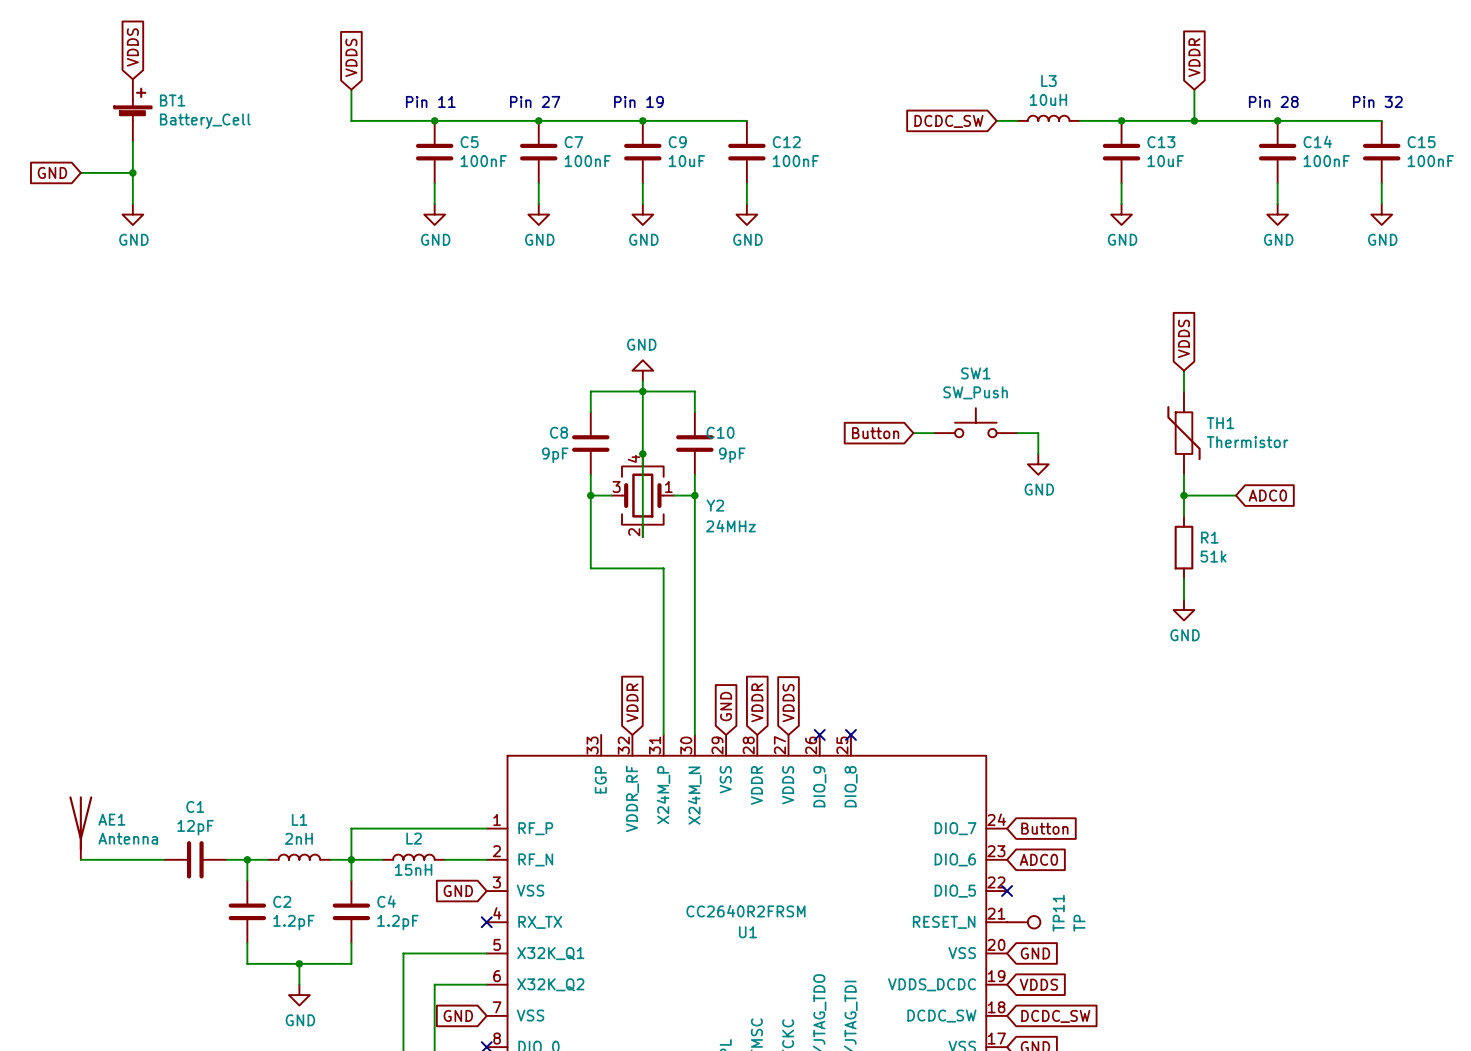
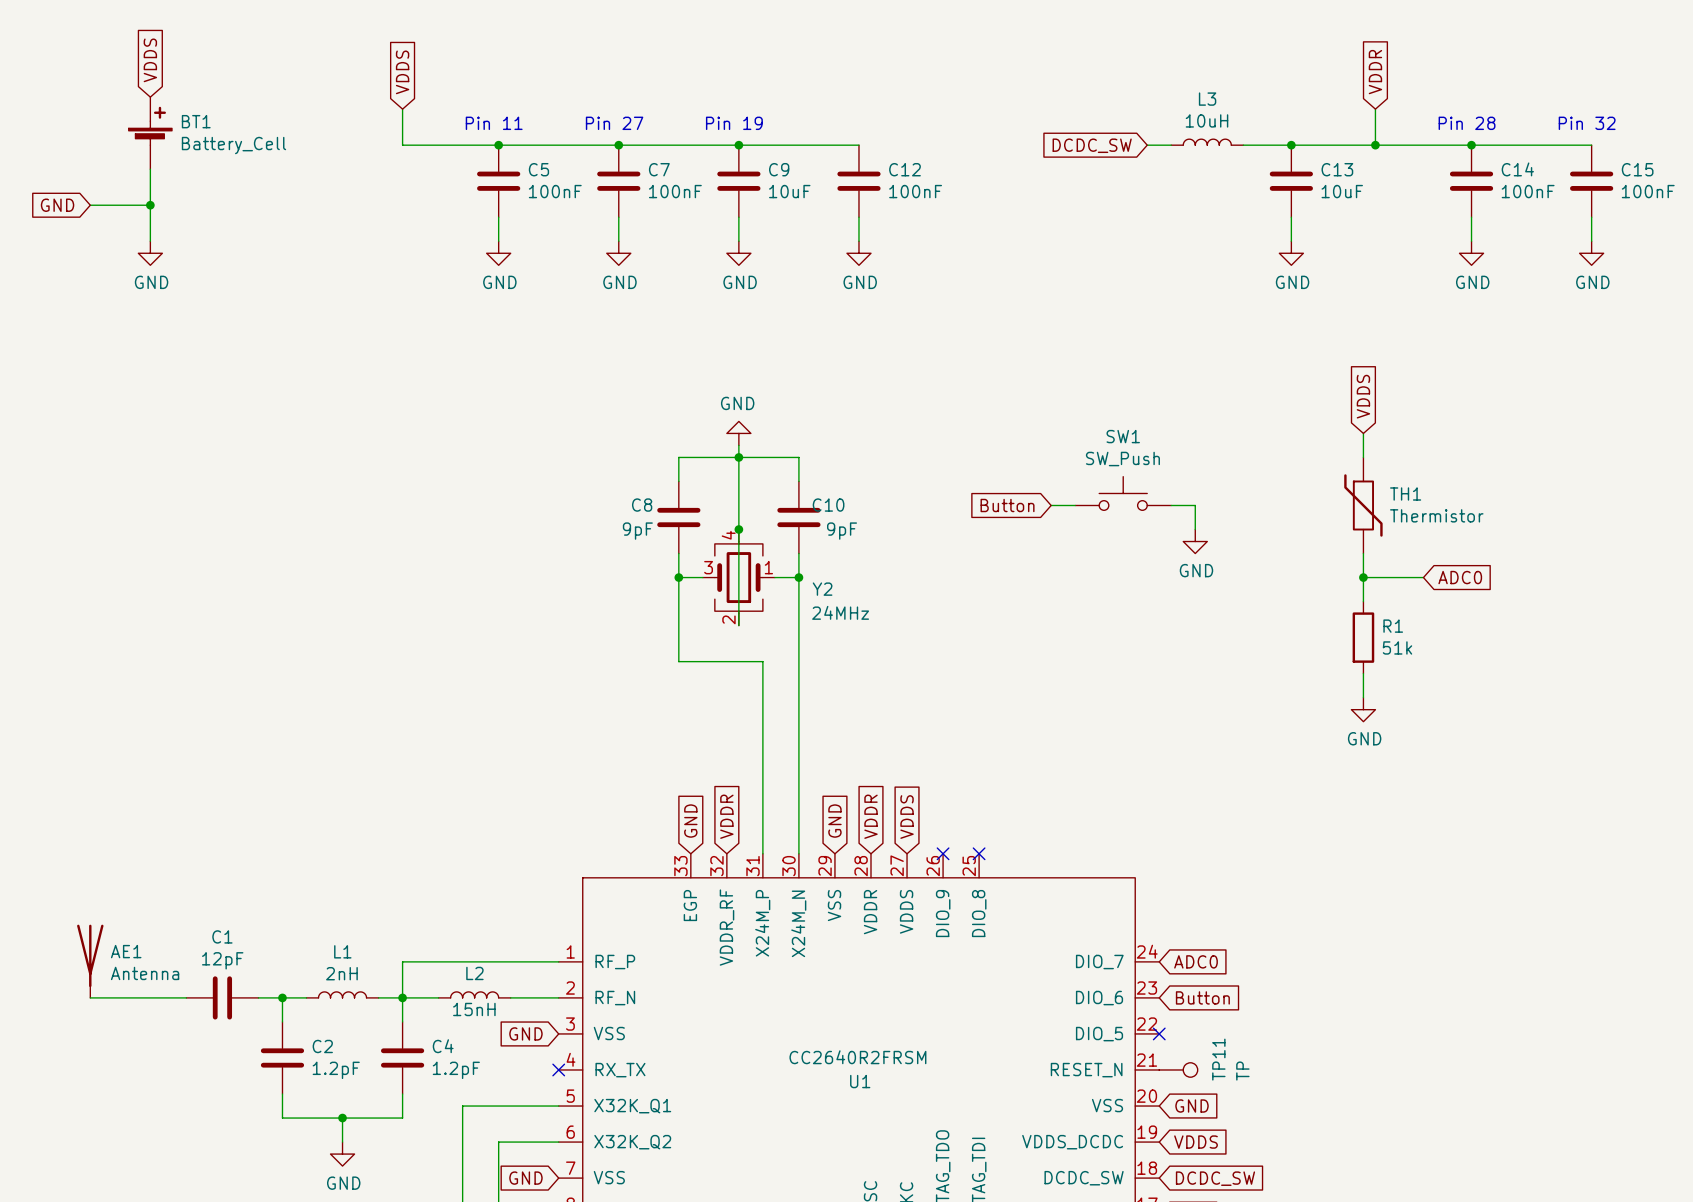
global label: none -> GND (690, 821)
global label: Button (1044, 828) -> ADC0 (1196, 961)
global label: ADC0 (1038, 859) -> Button (1202, 997)

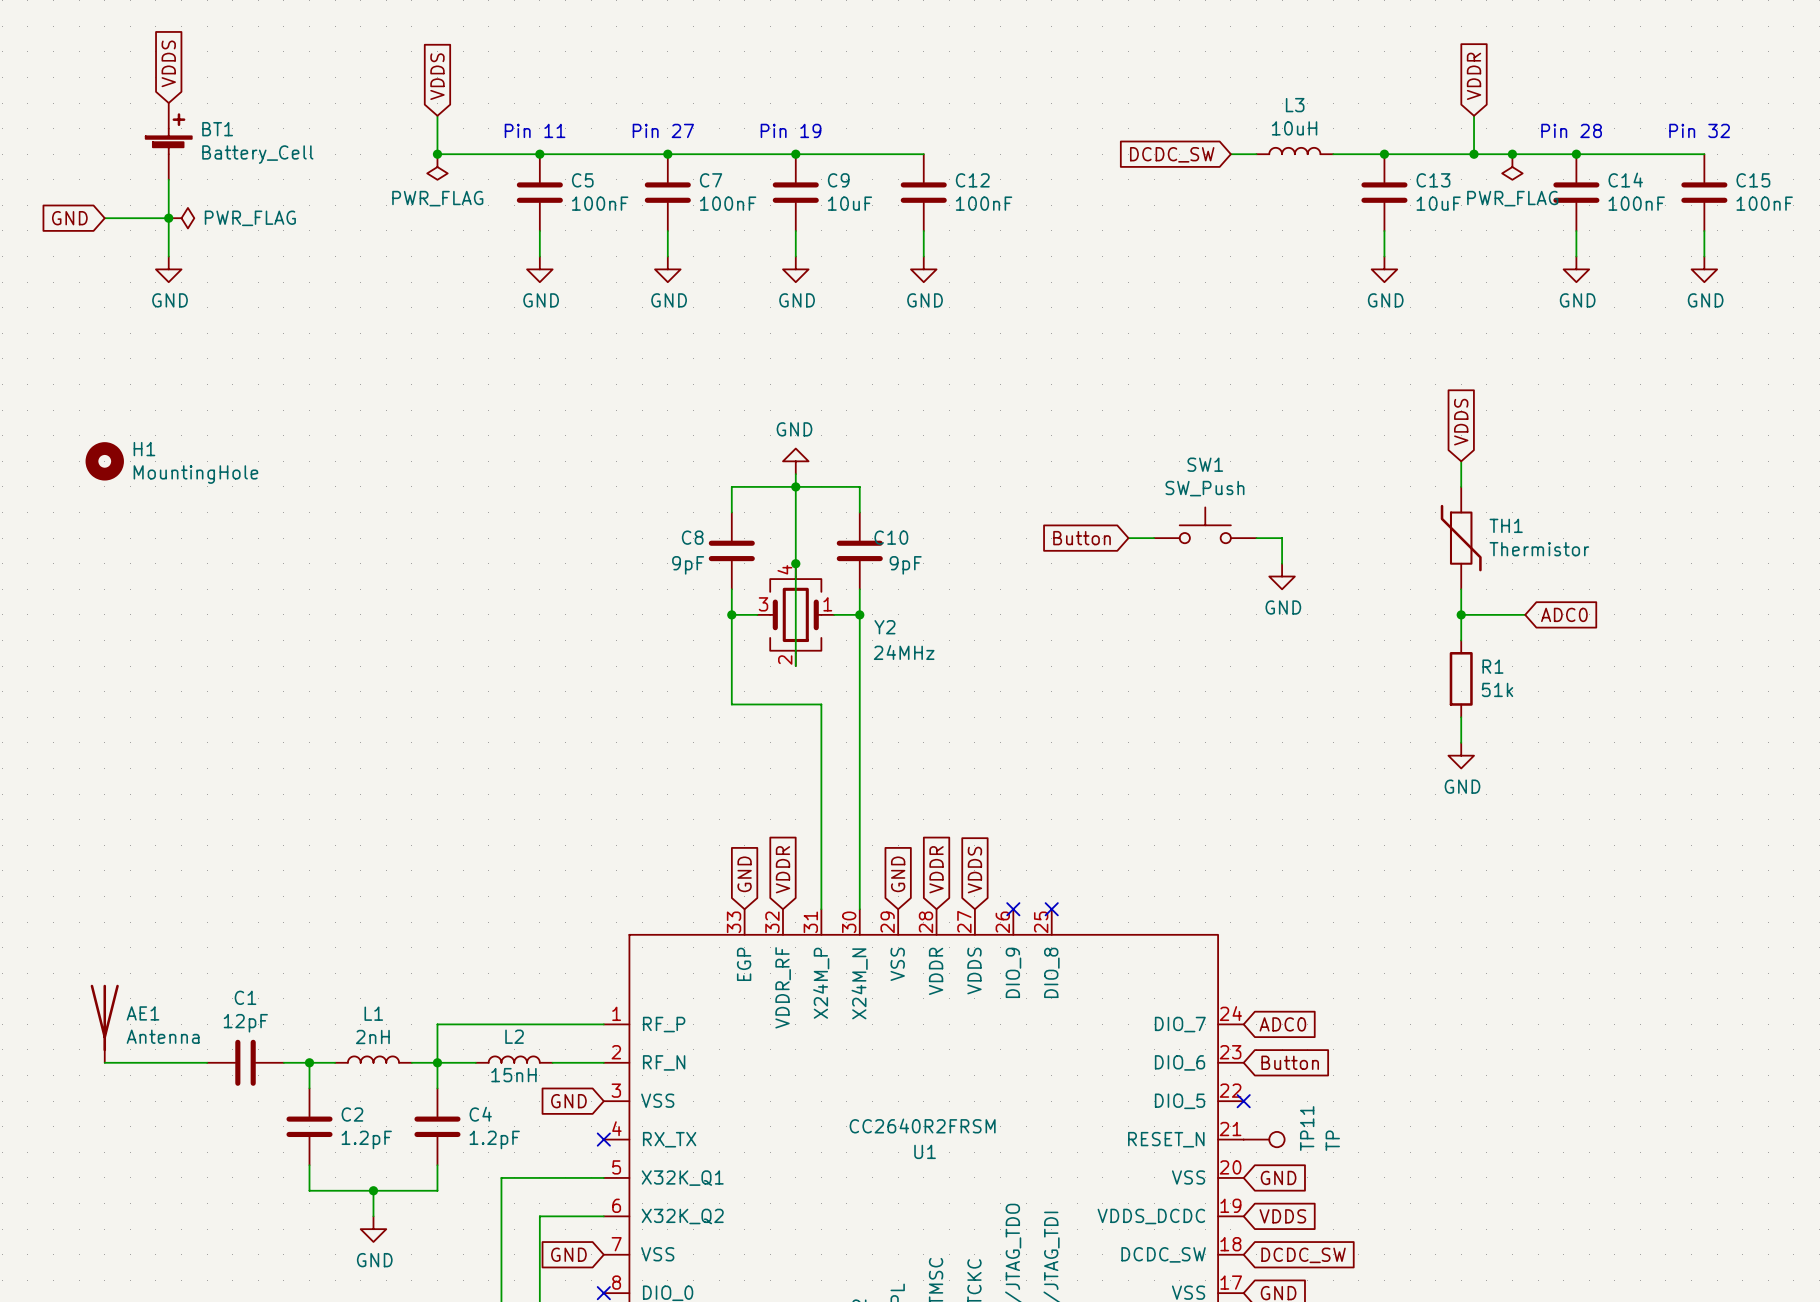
junction: none -> (437, 154)
junction: none -> (1512, 154)
power symbol: none -> PWR_FLAG (437, 167)
power symbol: none -> PWR_FLAG (1512, 167)
power symbol: none -> PWR_FLAG (181, 218)
H1: none -> MountingHole (104, 461)

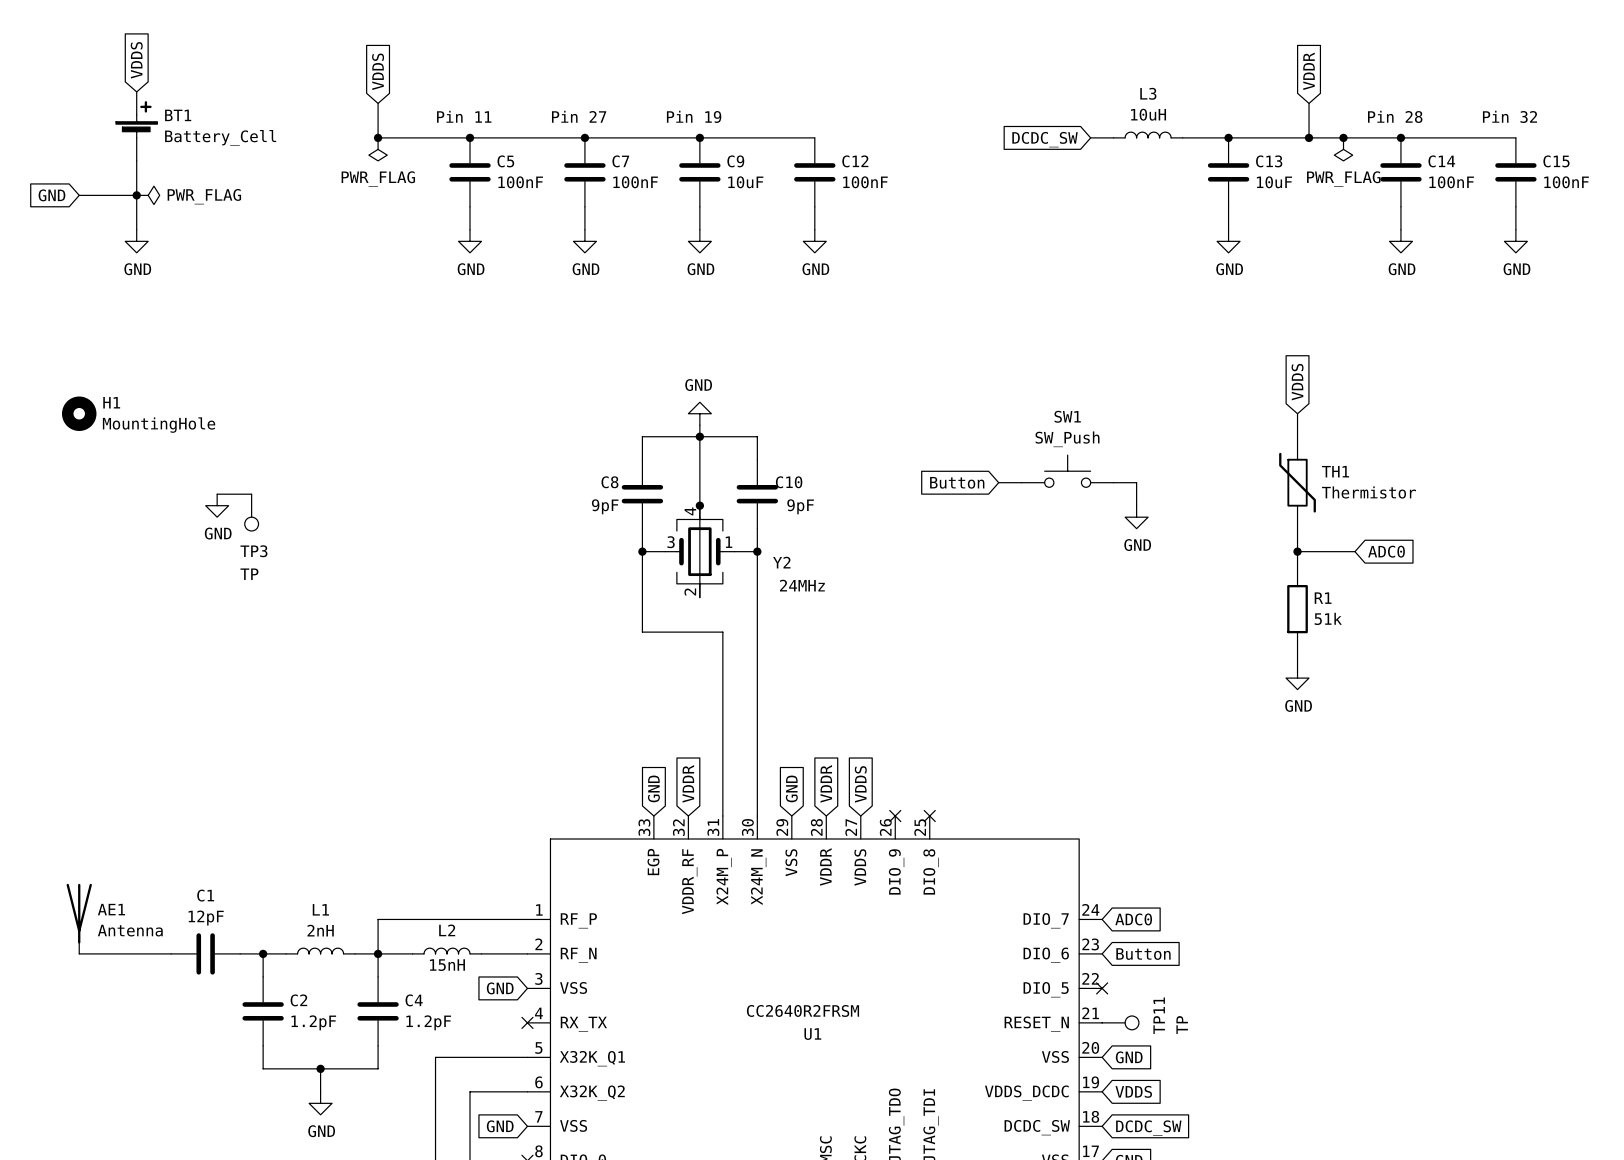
wire: none -> (217, 494) (251, 494)
power symbol: none -> GND (217, 505)
TP3: none -> TP (251, 512)

